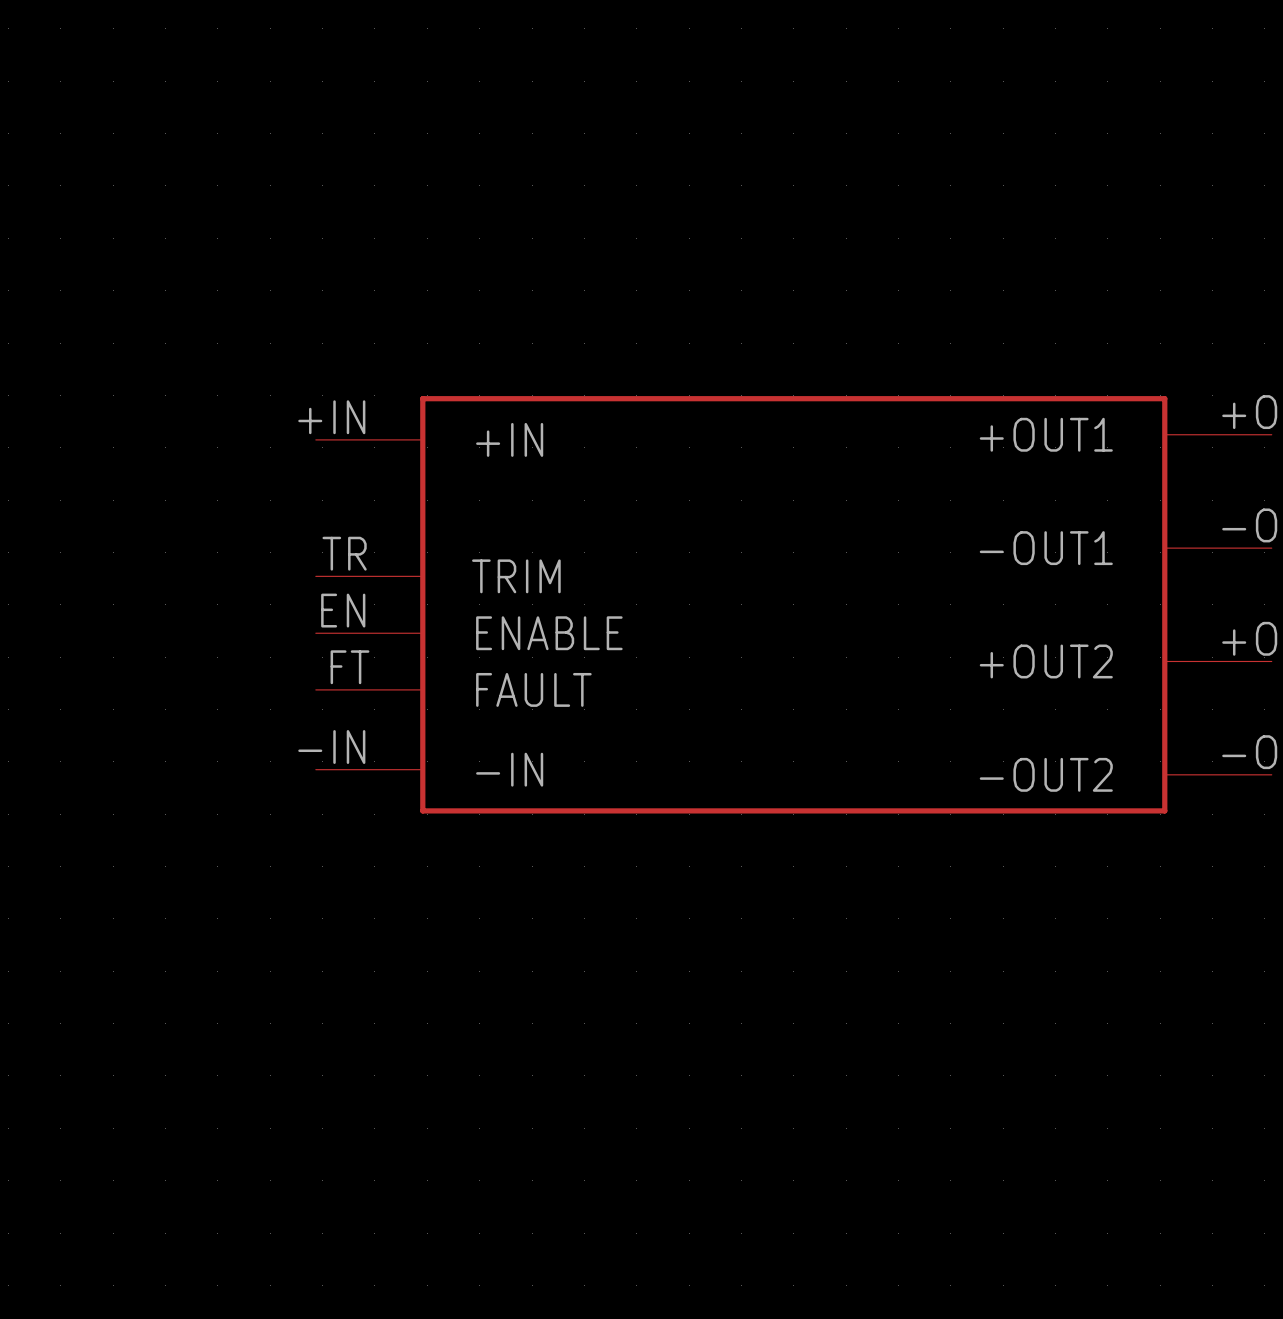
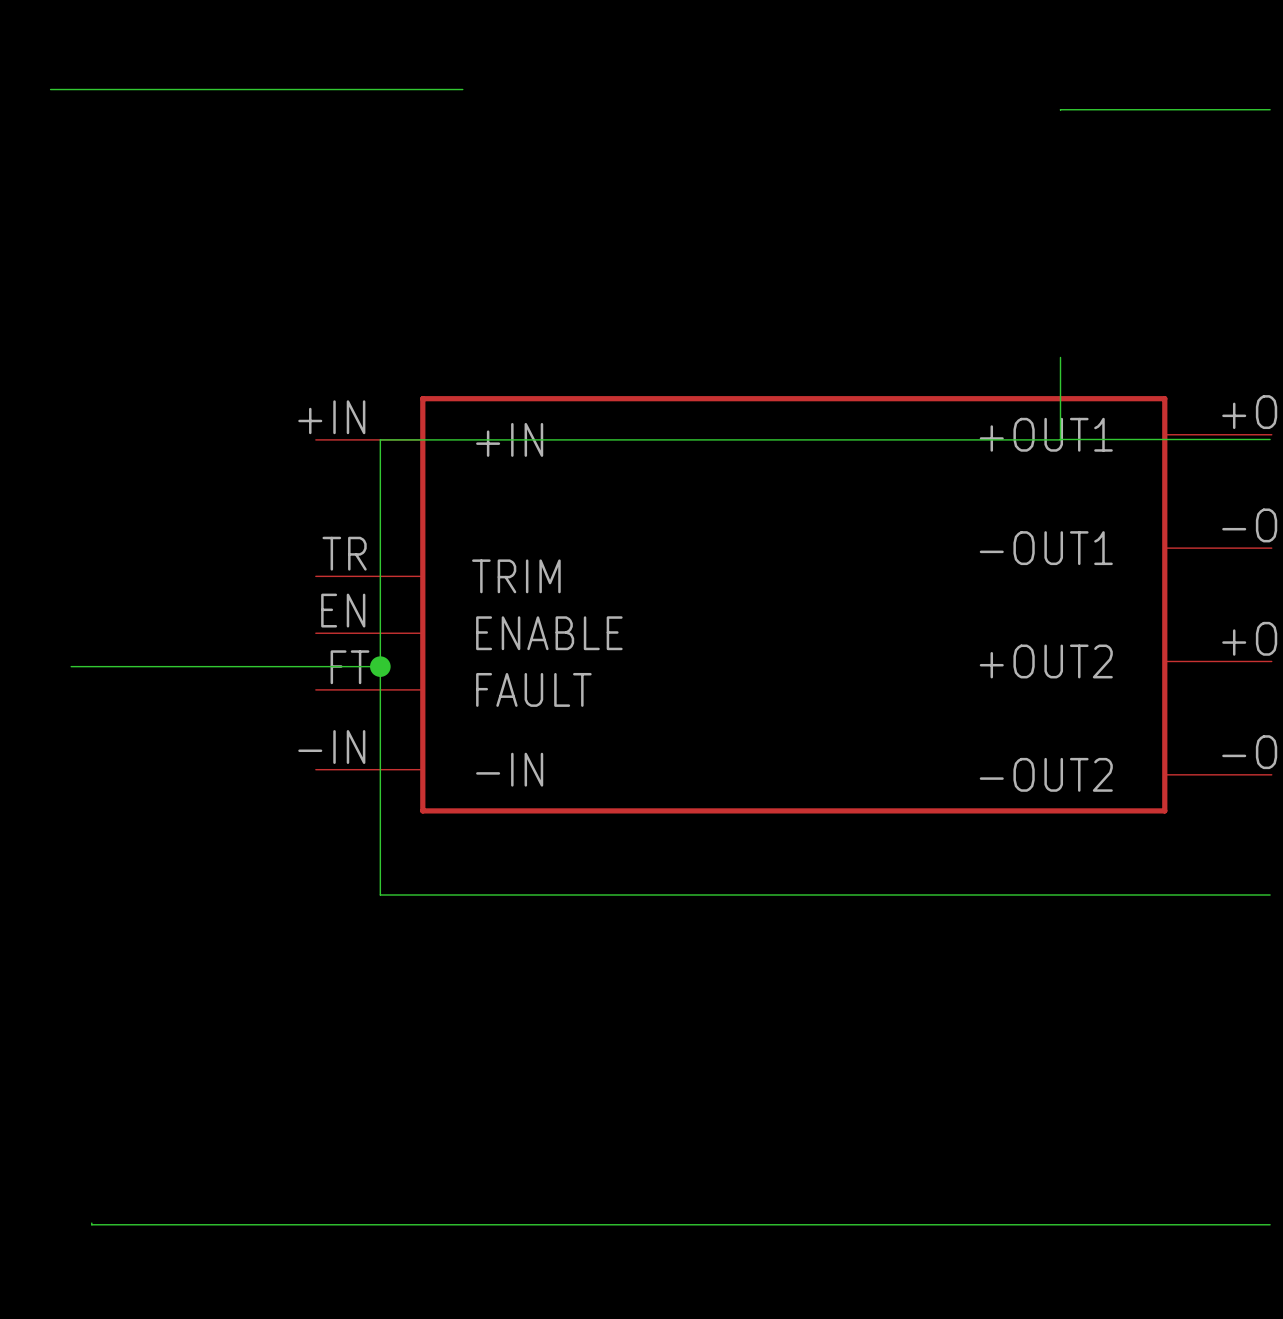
wire: none -> (50, 89) (462, 89)
wire: none -> (1060, 109) (1270, 109)
wire: none -> (1060, 357) (1060, 439) (1270, 439)
wire: none -> (1060, 439) (380, 439) (380, 895) (1270, 895)
wire: none -> (71, 666) (380, 666)
junction: none -> (380, 666)
wire: none -> (91, 1223) (91, 1224) (1270, 1224)

